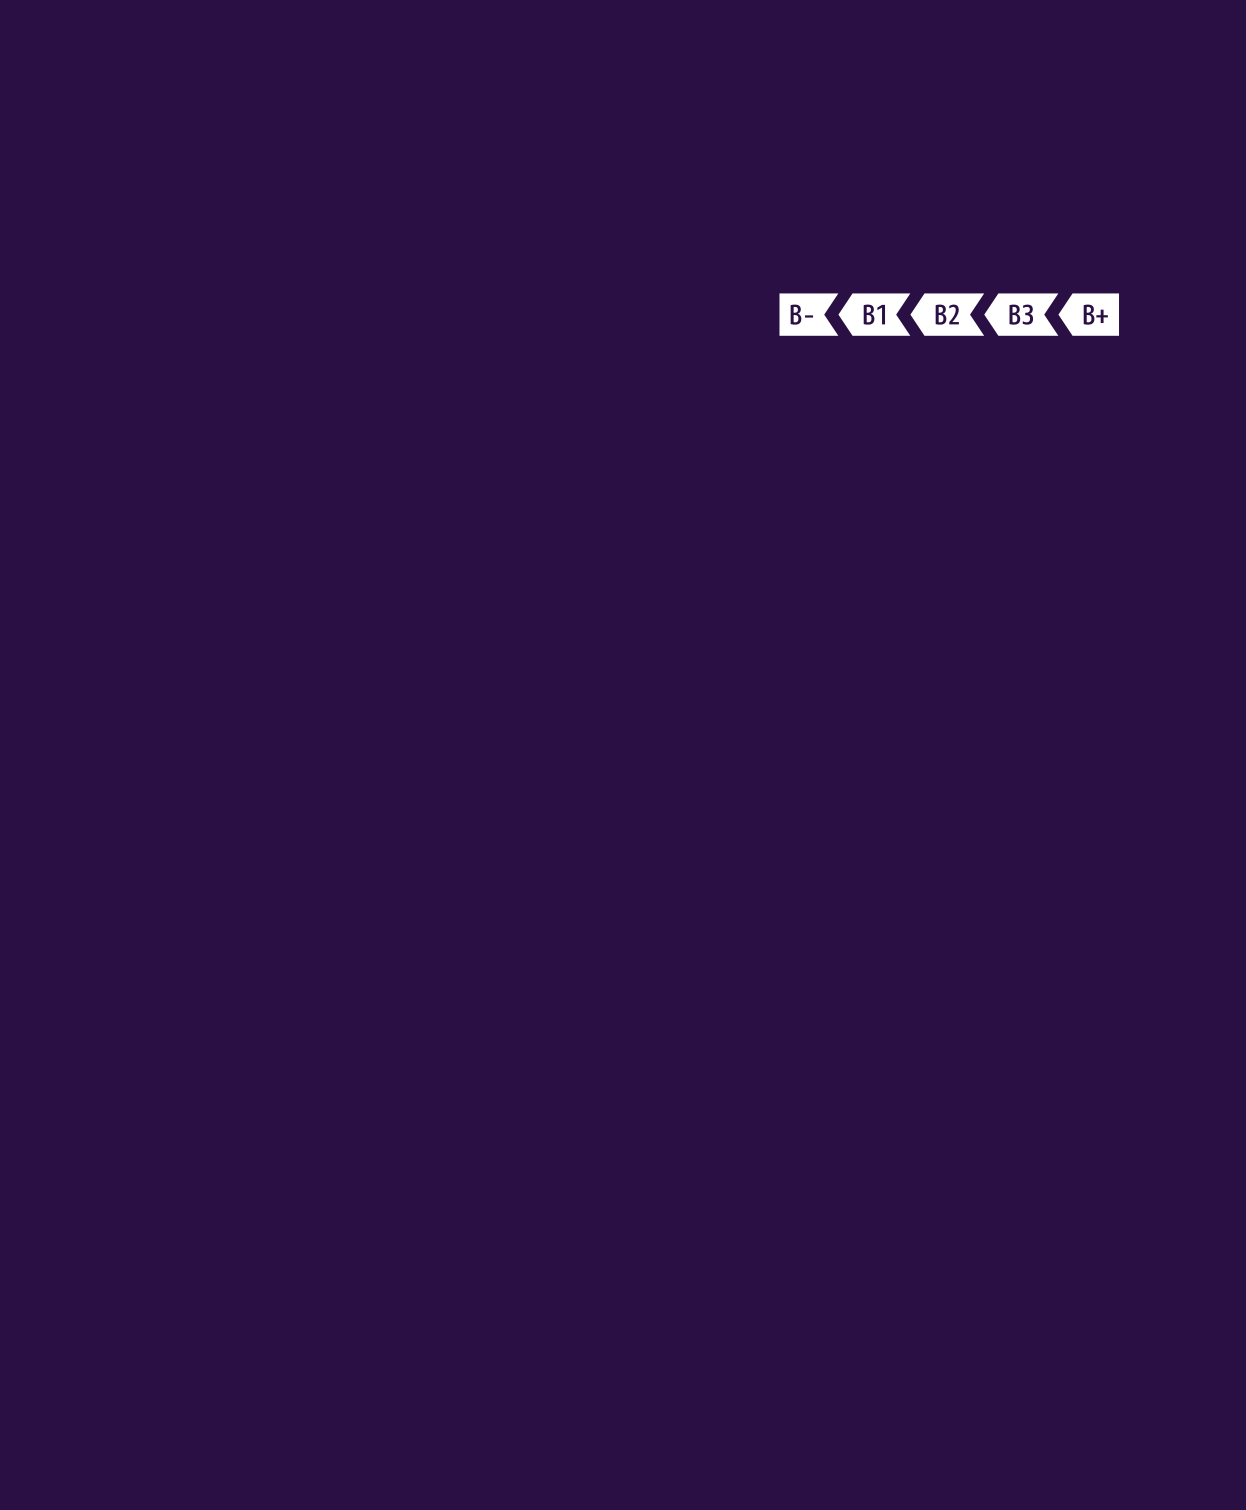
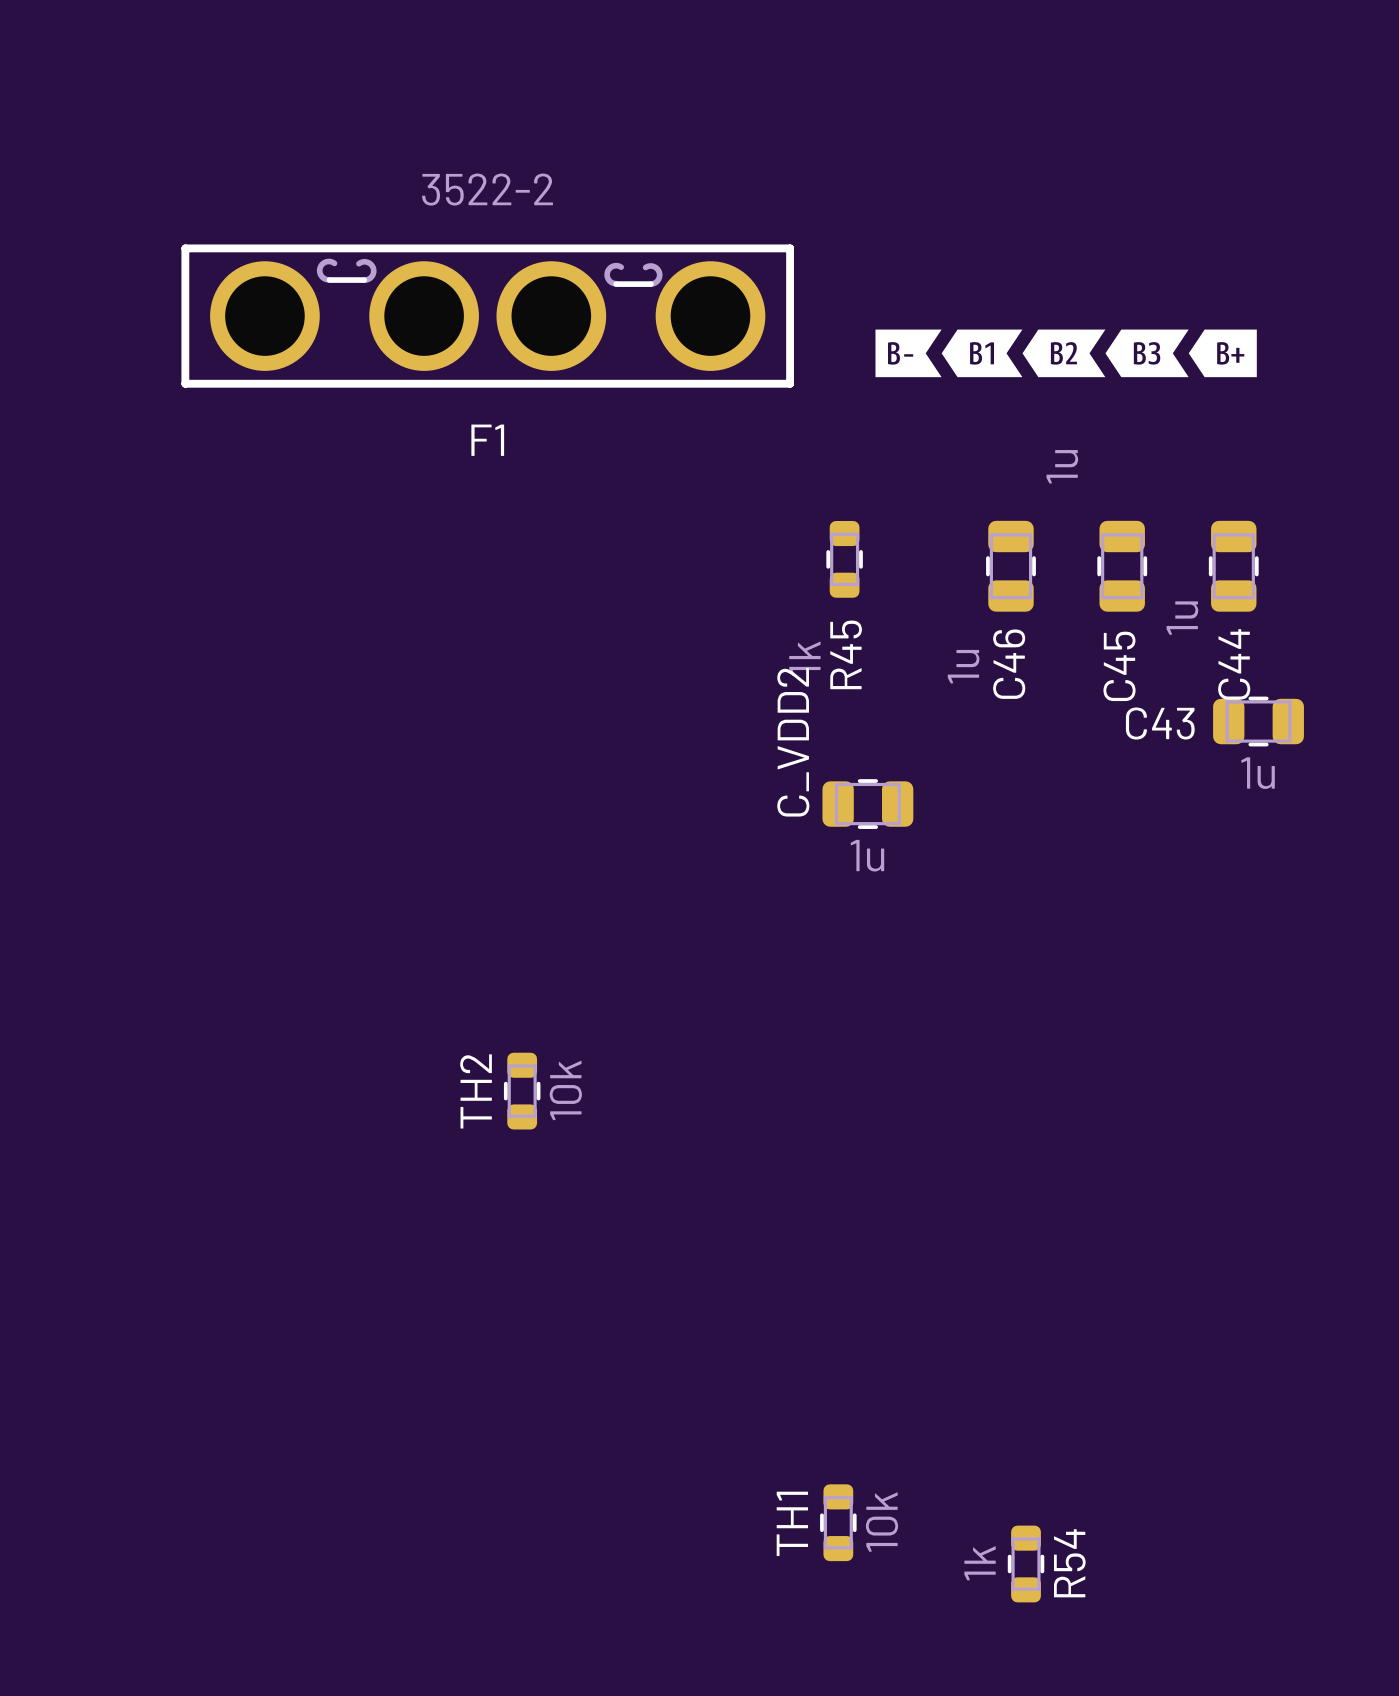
F1: none -> 3522-2 (487, 316)
R45: none -> 1k (844, 559)
C46: none -> 1u (1010, 566)
C45: none -> 1u (1122, 566)
C44: none -> 1u (1233, 566)
C43: none -> 1u (1258, 721)
C_VDD2: none -> 1u (867, 804)
TH2: none -> 10k (522, 1091)
TH1: none -> 10k (838, 1522)
R54: none -> 1k (1026, 1564)

